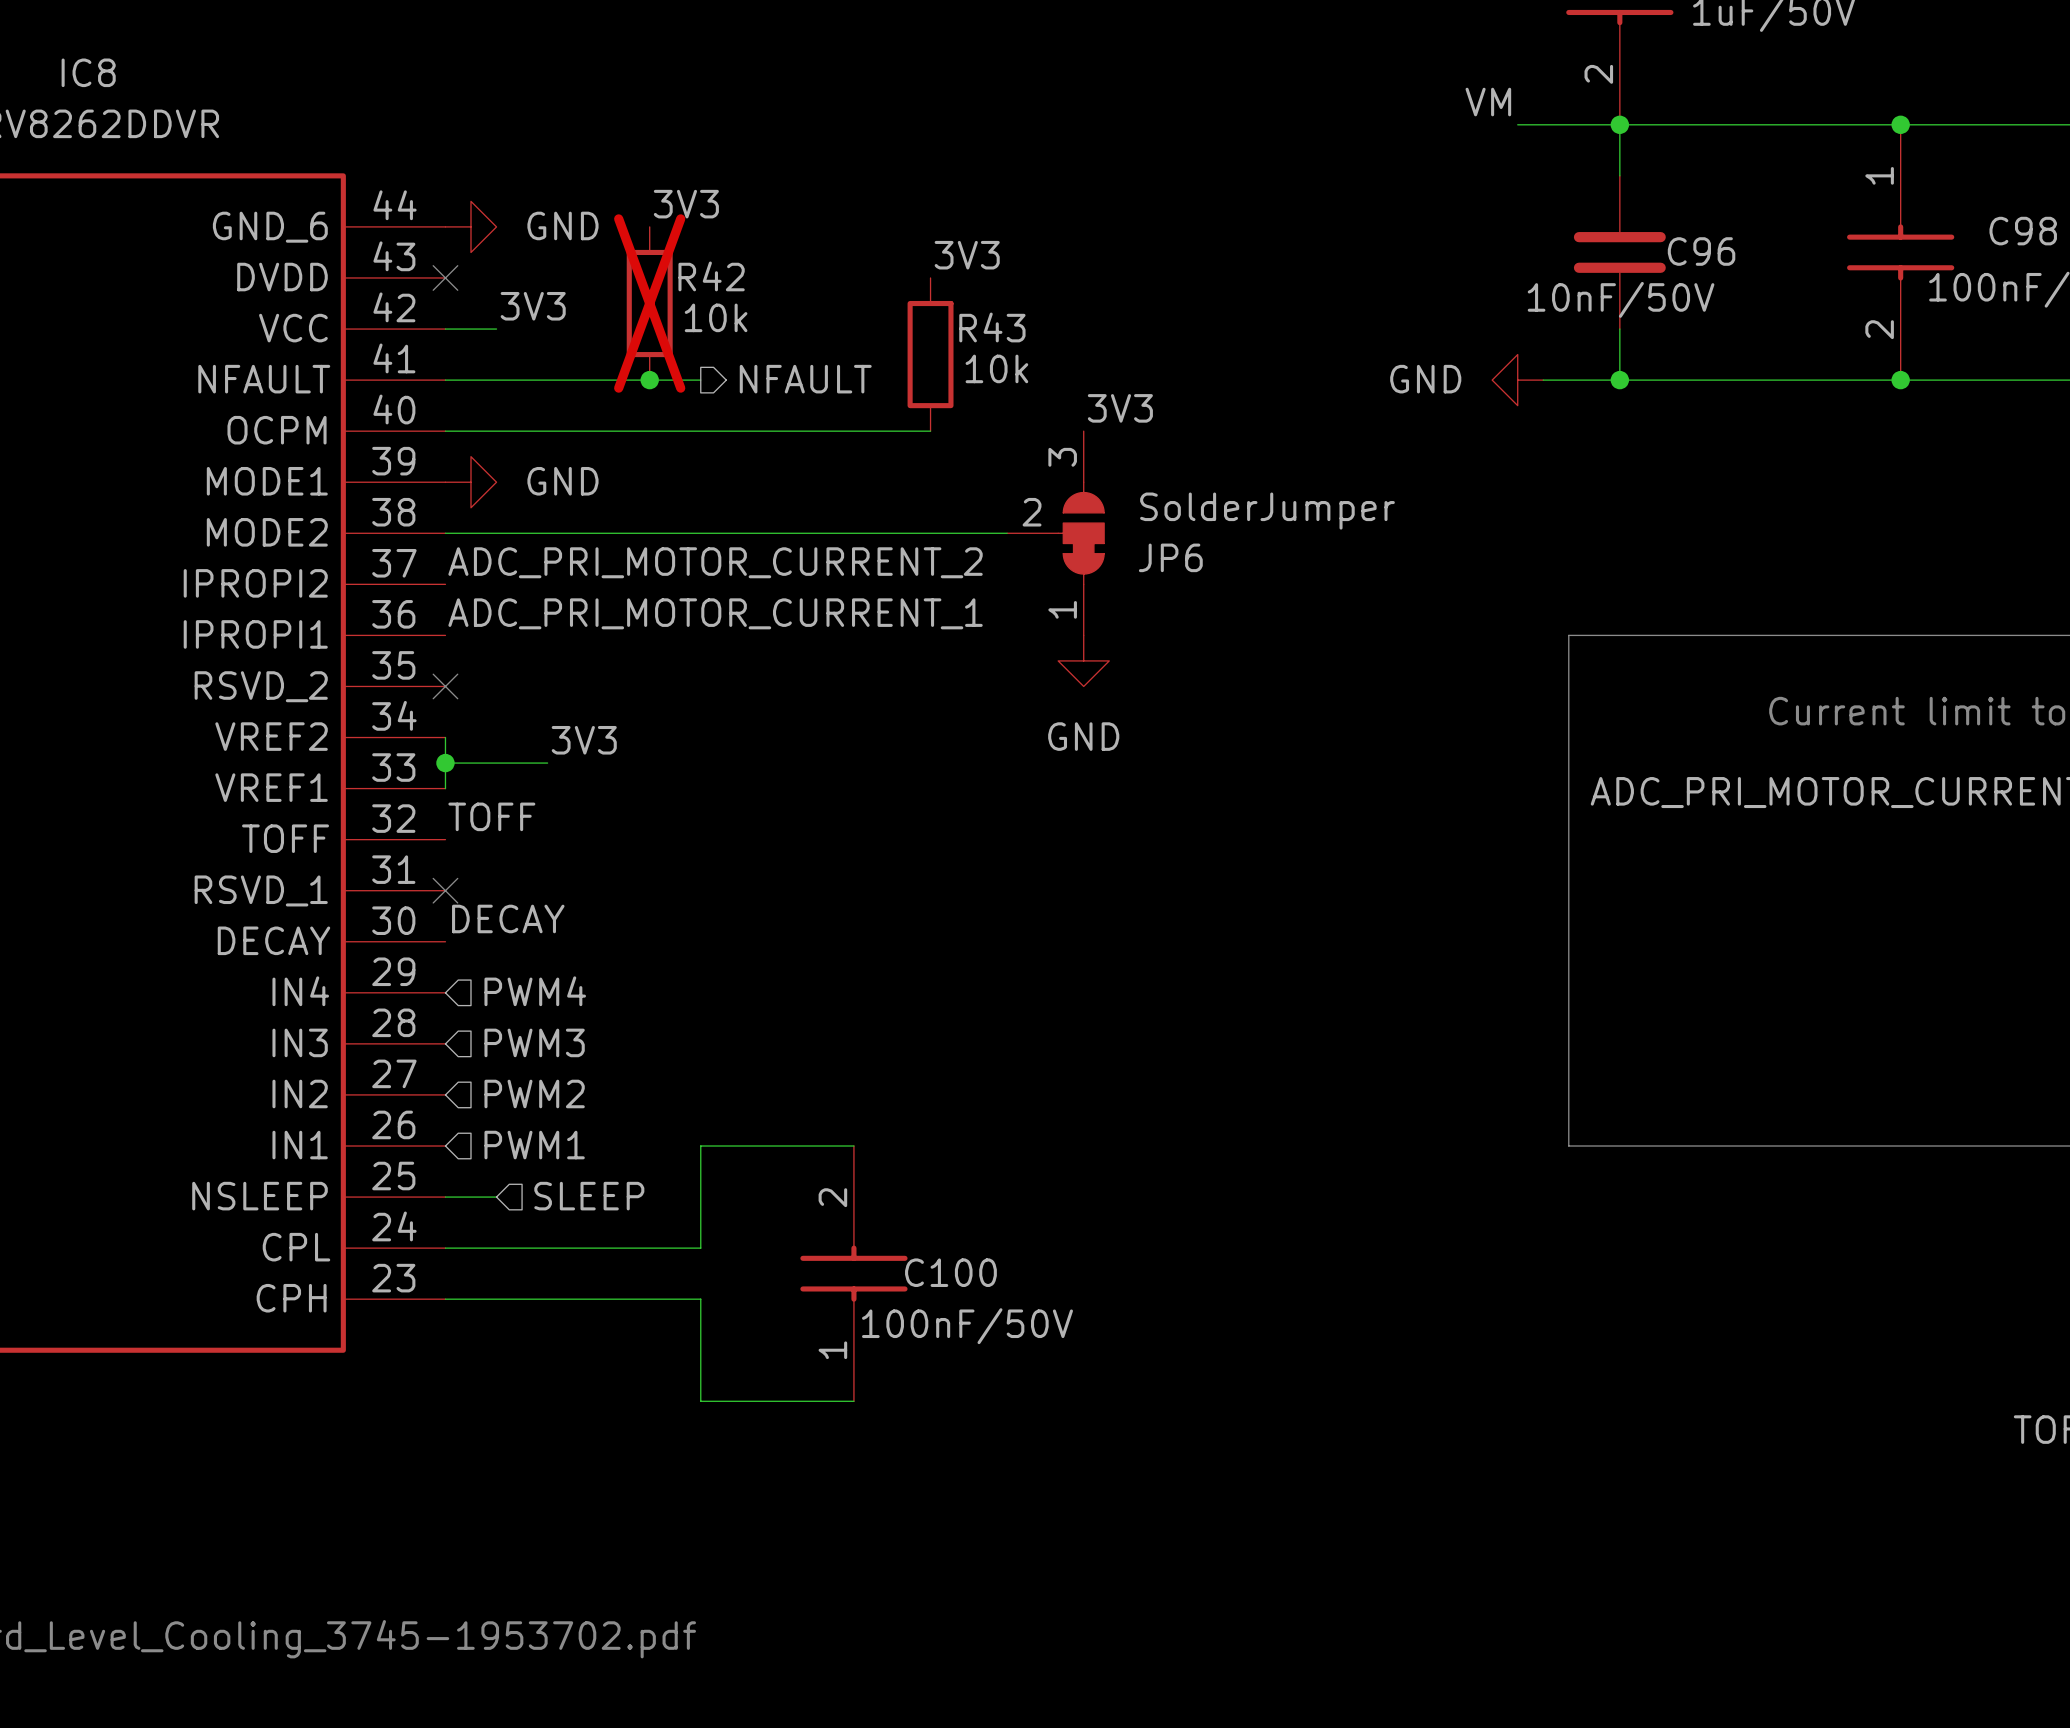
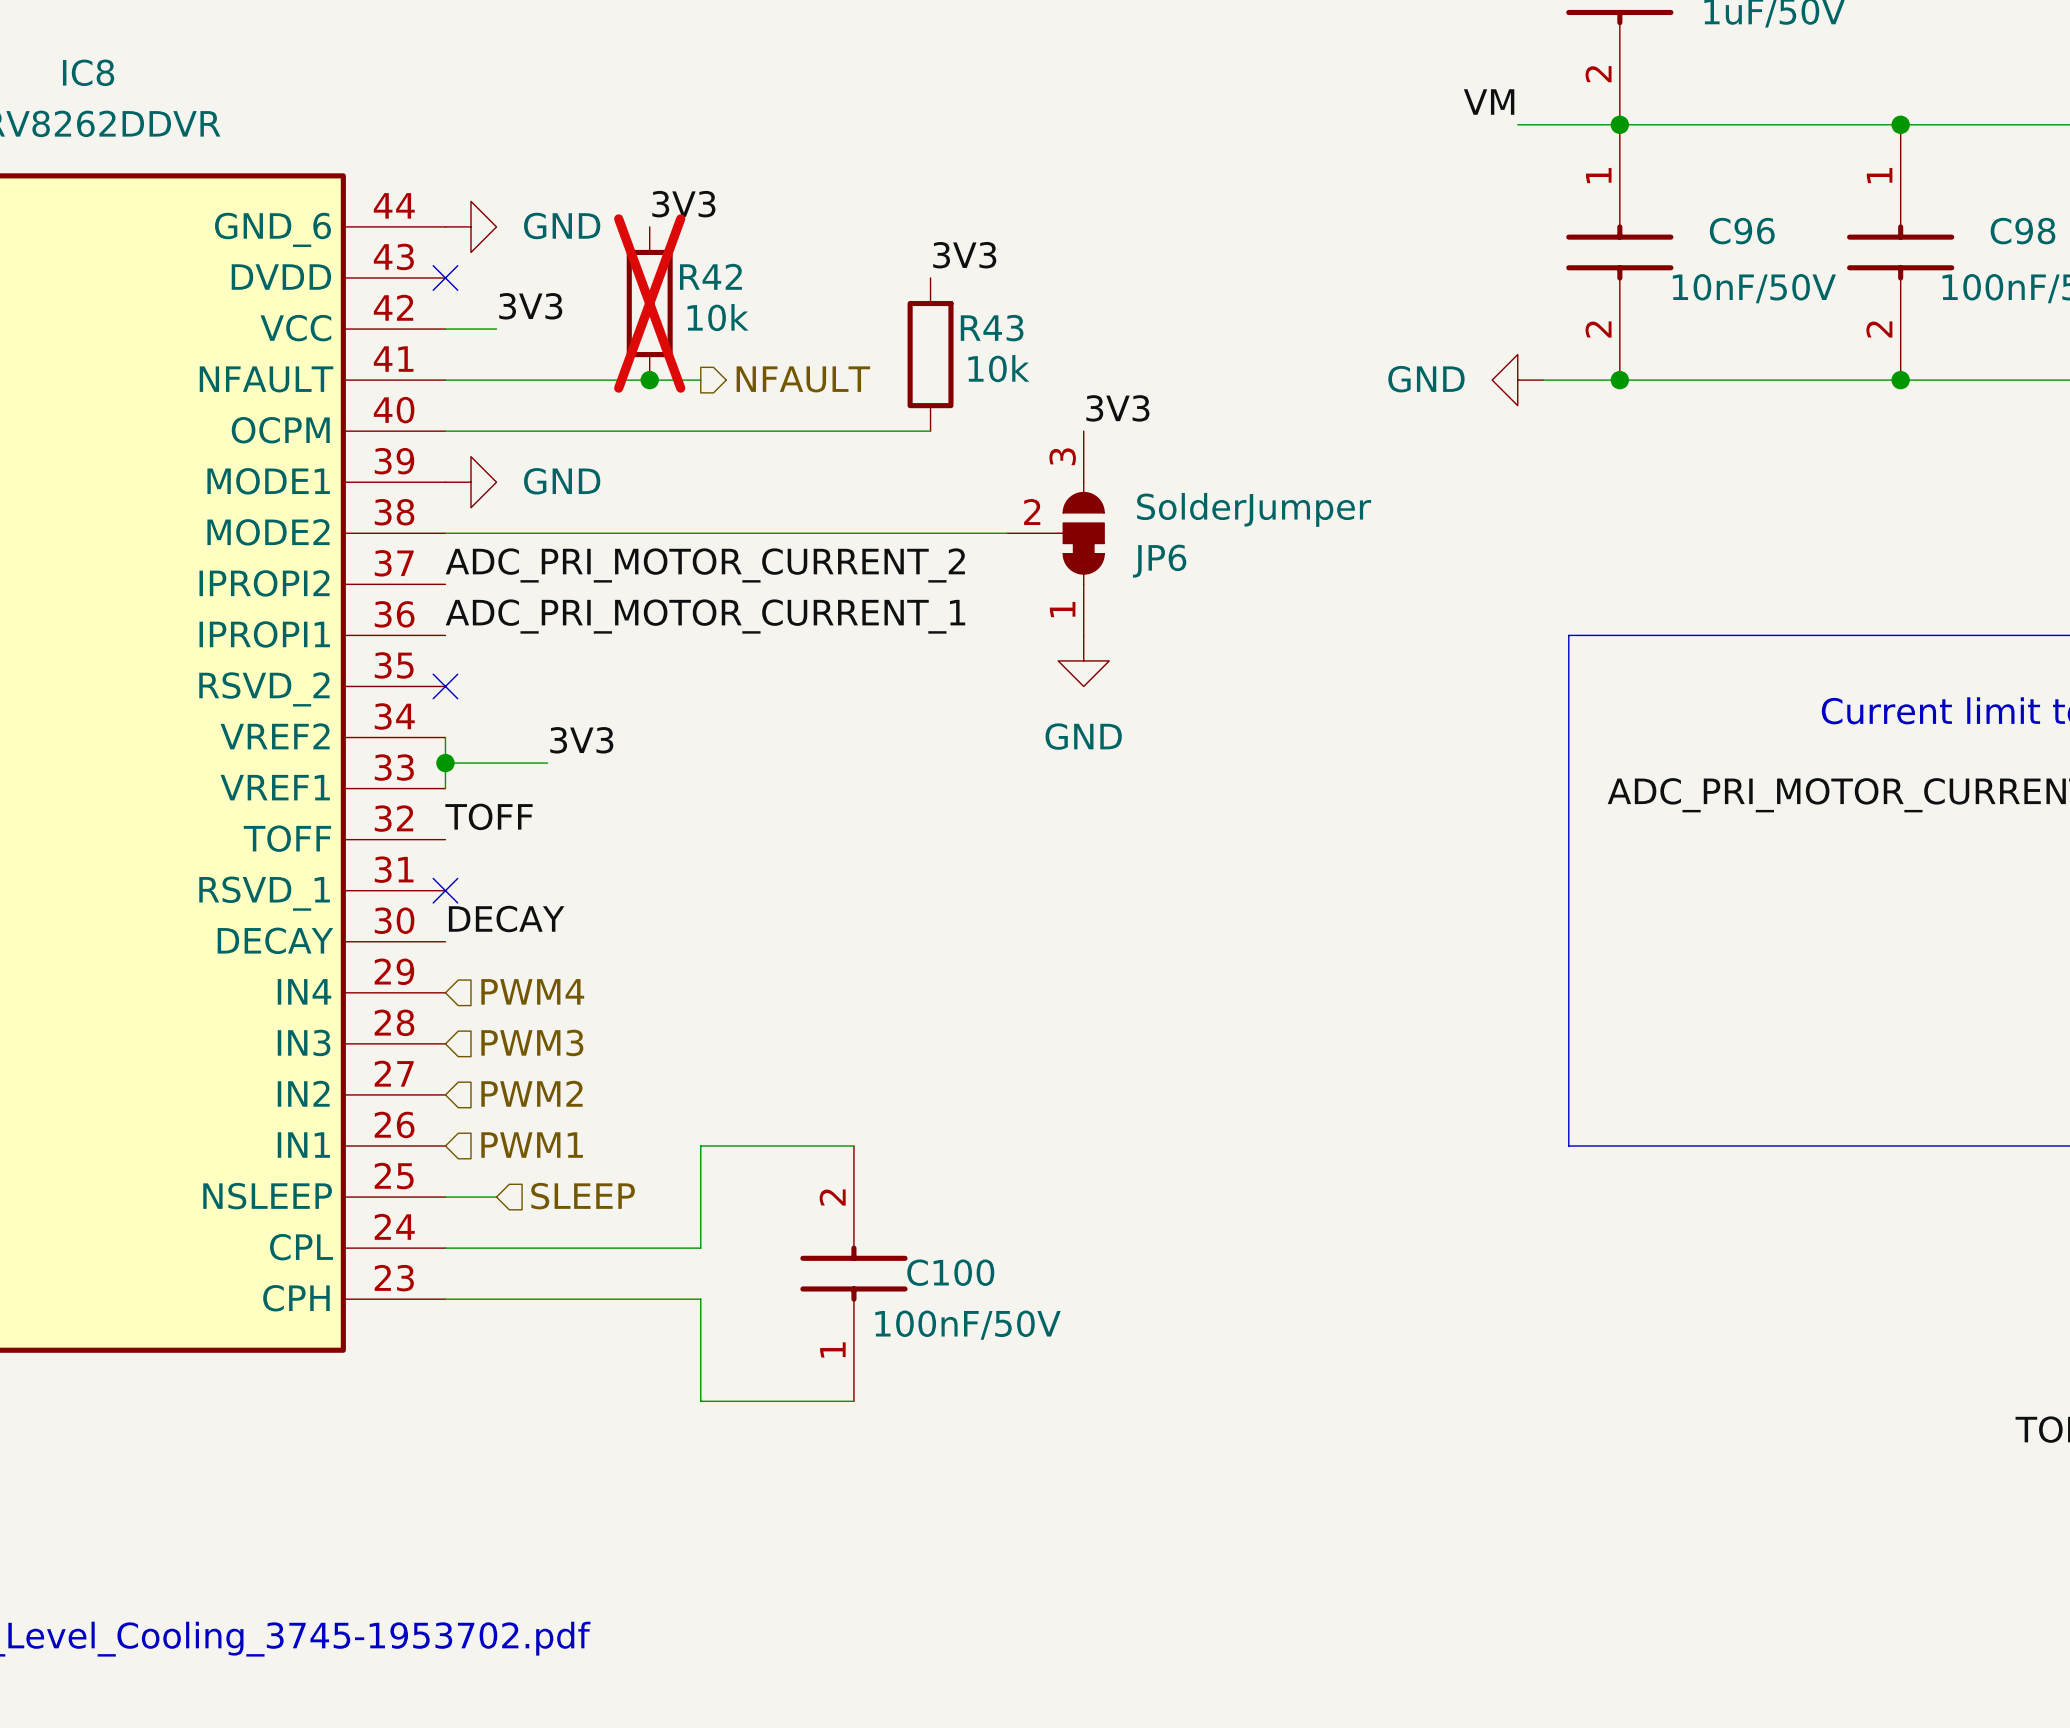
C96 symbol: [1573, 175, 1666, 330] -> [1566, 124, 1674, 381]
C96 name position: C96 (1701, 251) -> C96 (1742, 231)
C96 value position: 10nF/50V (1621, 299) -> 10nF/50V (1754, 288)

